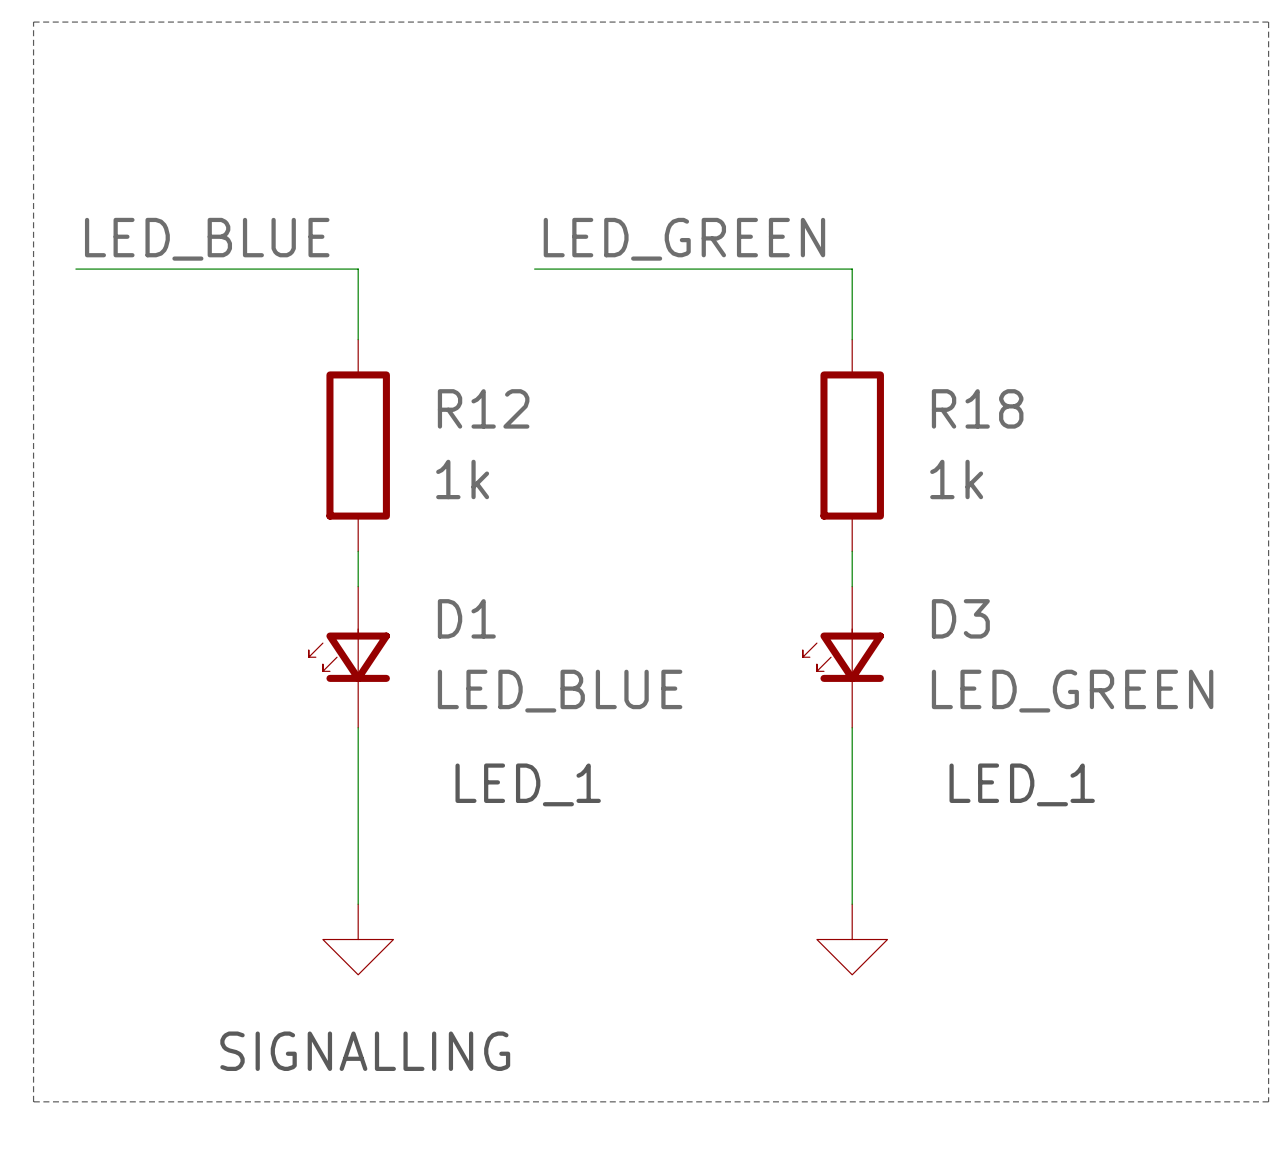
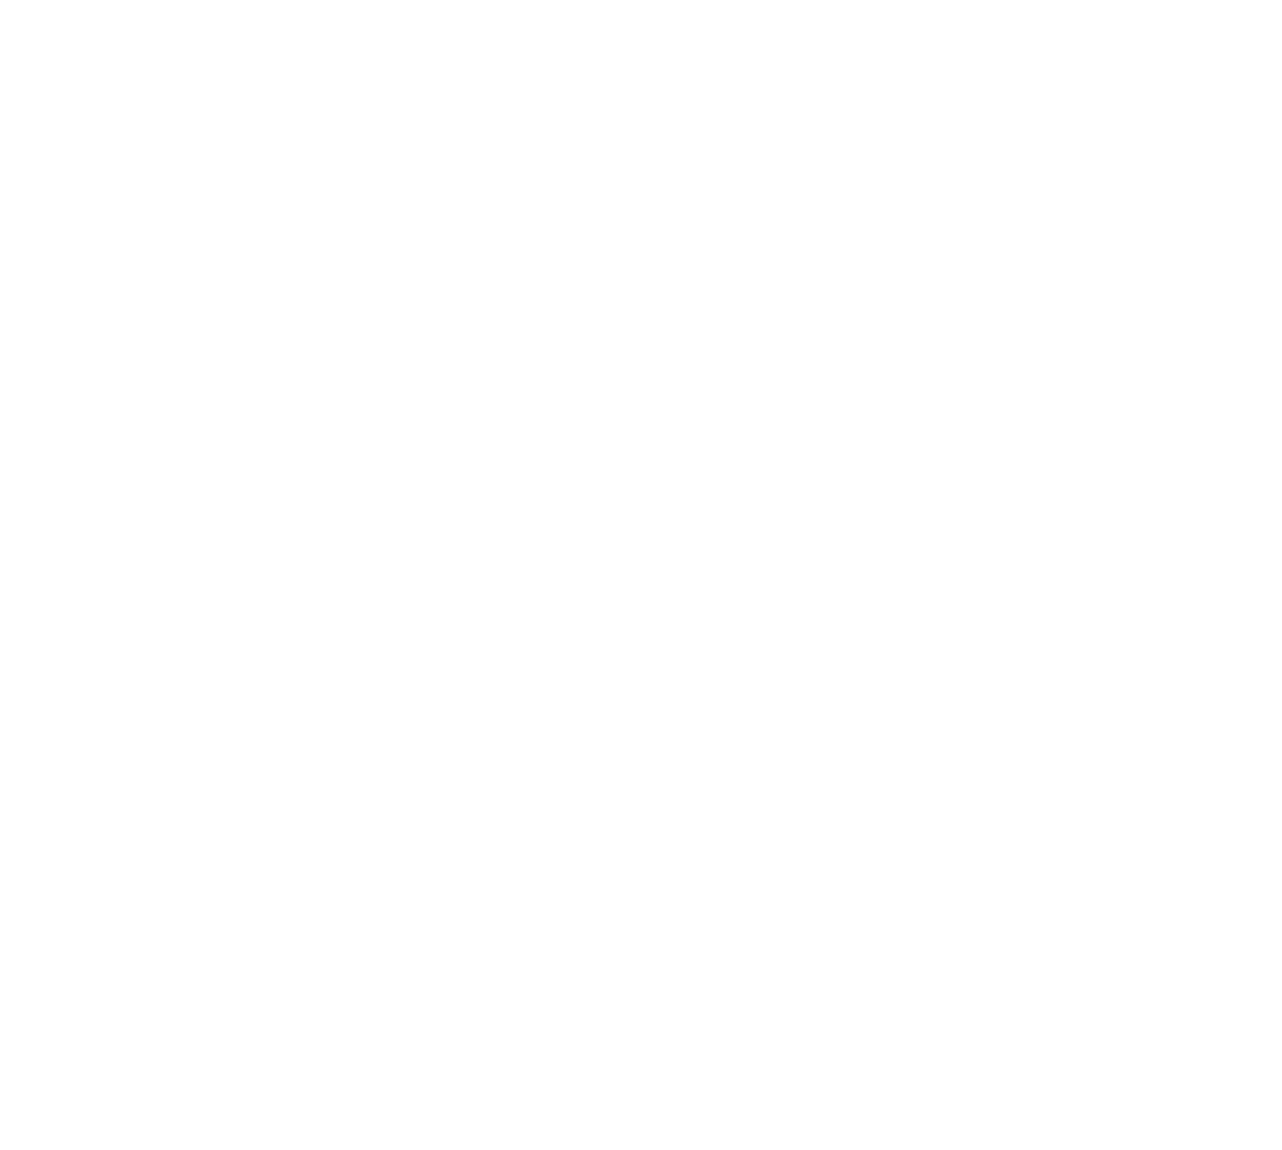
line: (33, 22) (1268, 22) (1268, 1101) (33, 1101) (33, 22) -> none
label: LED_BLUE (207, 239) -> none
label: LED_GREEN (684, 239) -> none
wire: (75, 269) (358, 269) (358, 339) -> none
wire: (534, 269) (852, 269) (852, 339) -> none
R12: 1k (358, 445) -> none
R18: 1k (852, 445) -> none
wire: (358, 551) (358, 586) -> none
wire: (852, 551) (852, 586) -> none
D1: LED_BLUE (349, 657) -> none
D3: LED_GREEN (843, 657) -> none
wire: (358, 727) (358, 904) -> none
wire: (852, 727) (852, 904) -> none
text: LED_1 (528, 784) -> none
text: LED_1 (1022, 784) -> none
power symbol: (358, 939) -> none
power symbol: (852, 939) -> none
text: SIGNALLING (365, 1051) -> none

